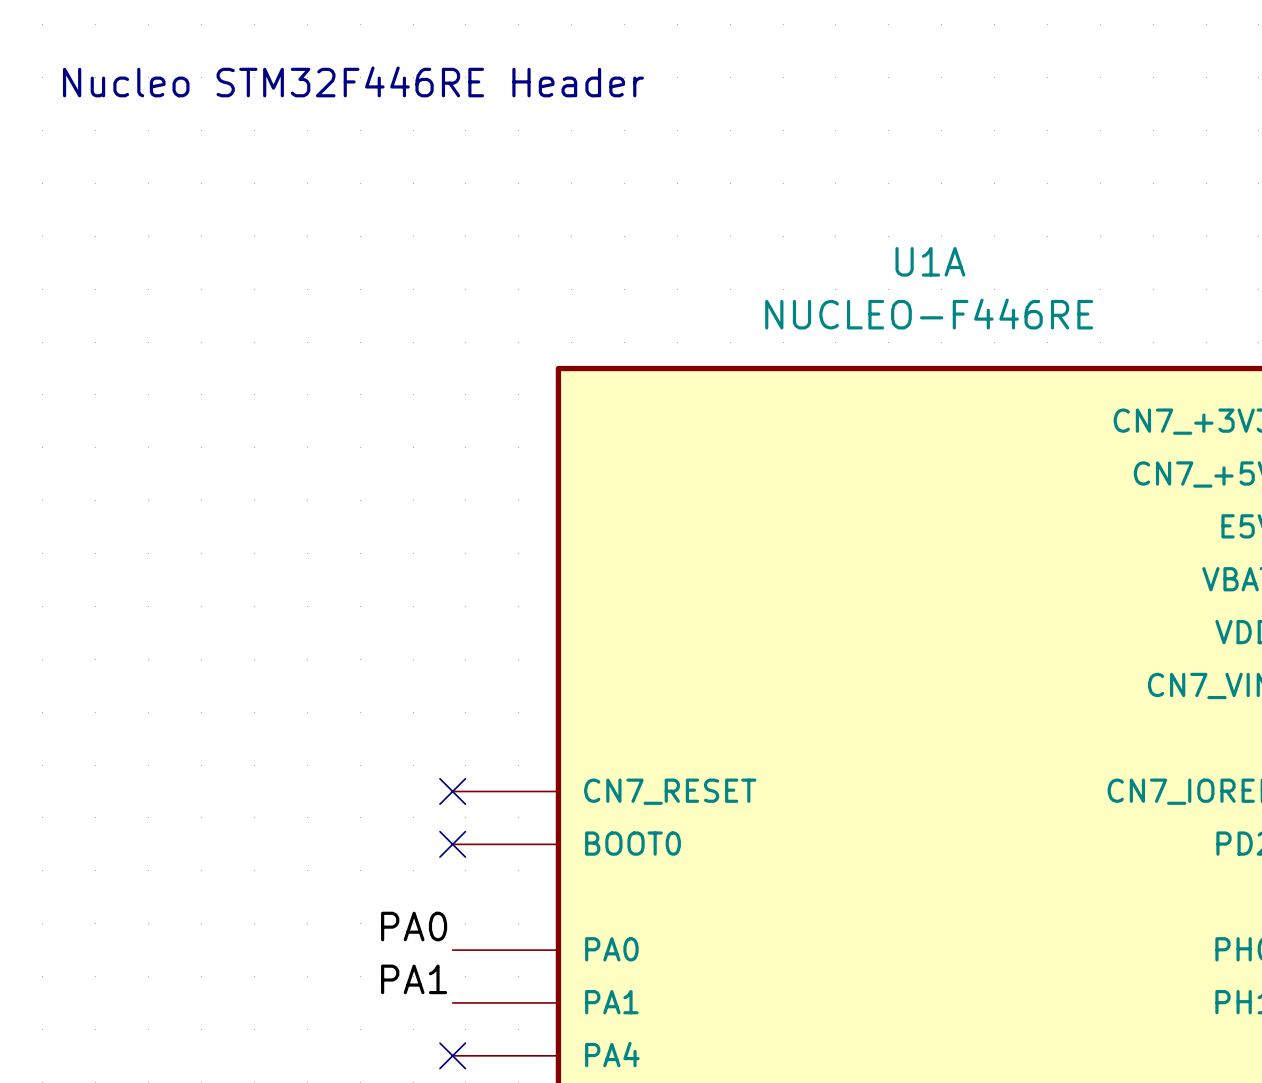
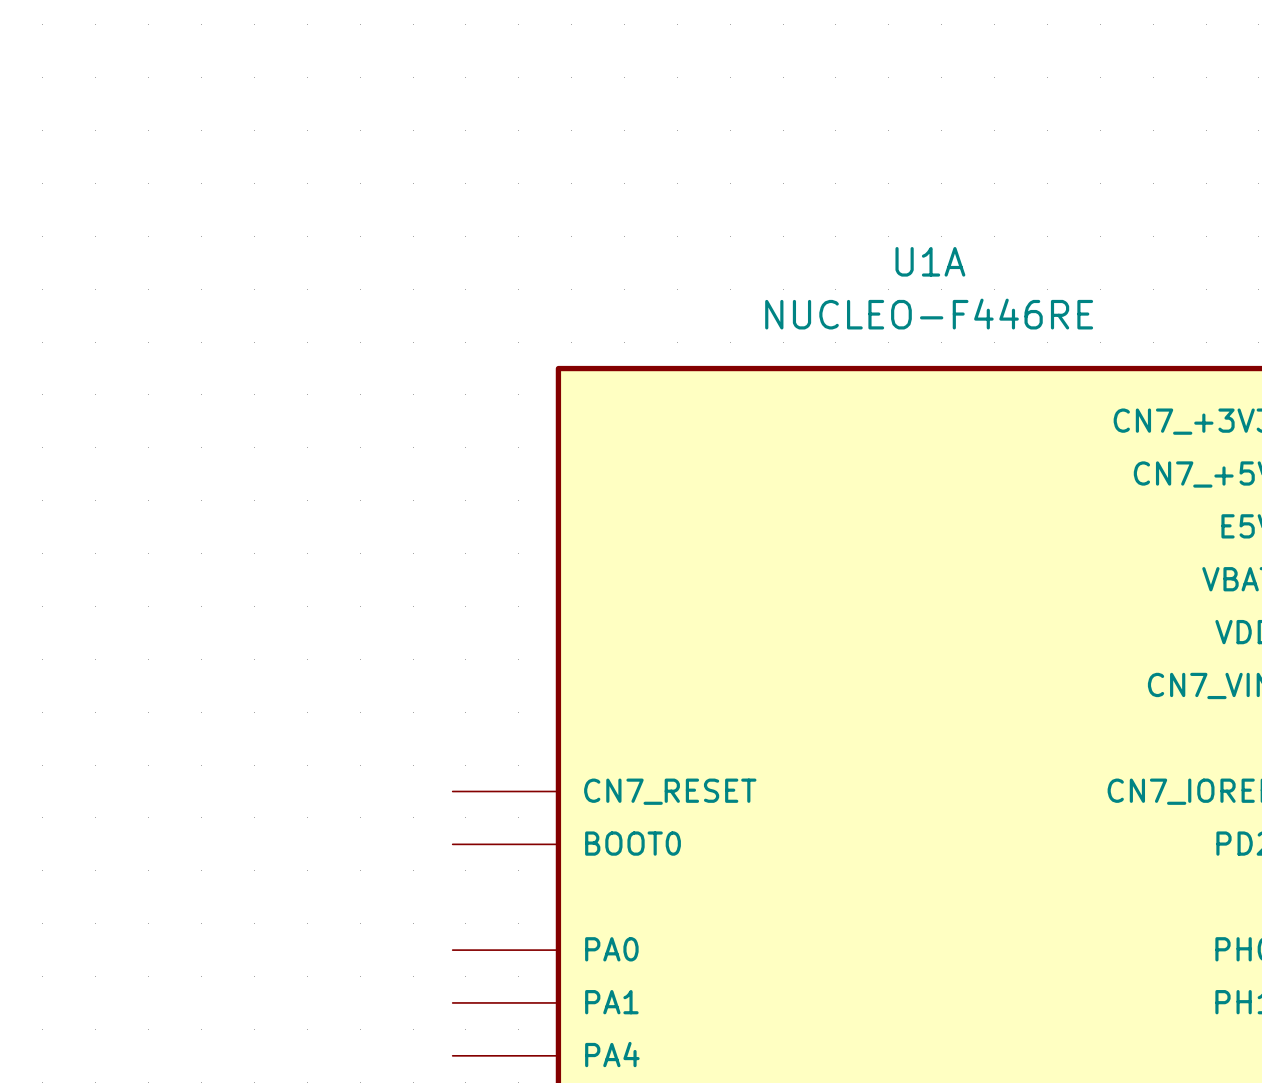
text: Nucleo STM32F446RE Header (353, 81) -> none
no-connect mark: (452, 791) -> none
no-connect mark: (452, 844) -> none
label: PA0 (414, 926) -> none
label: PA1 (414, 979) -> none
no-connect mark: (452, 1055) -> none

